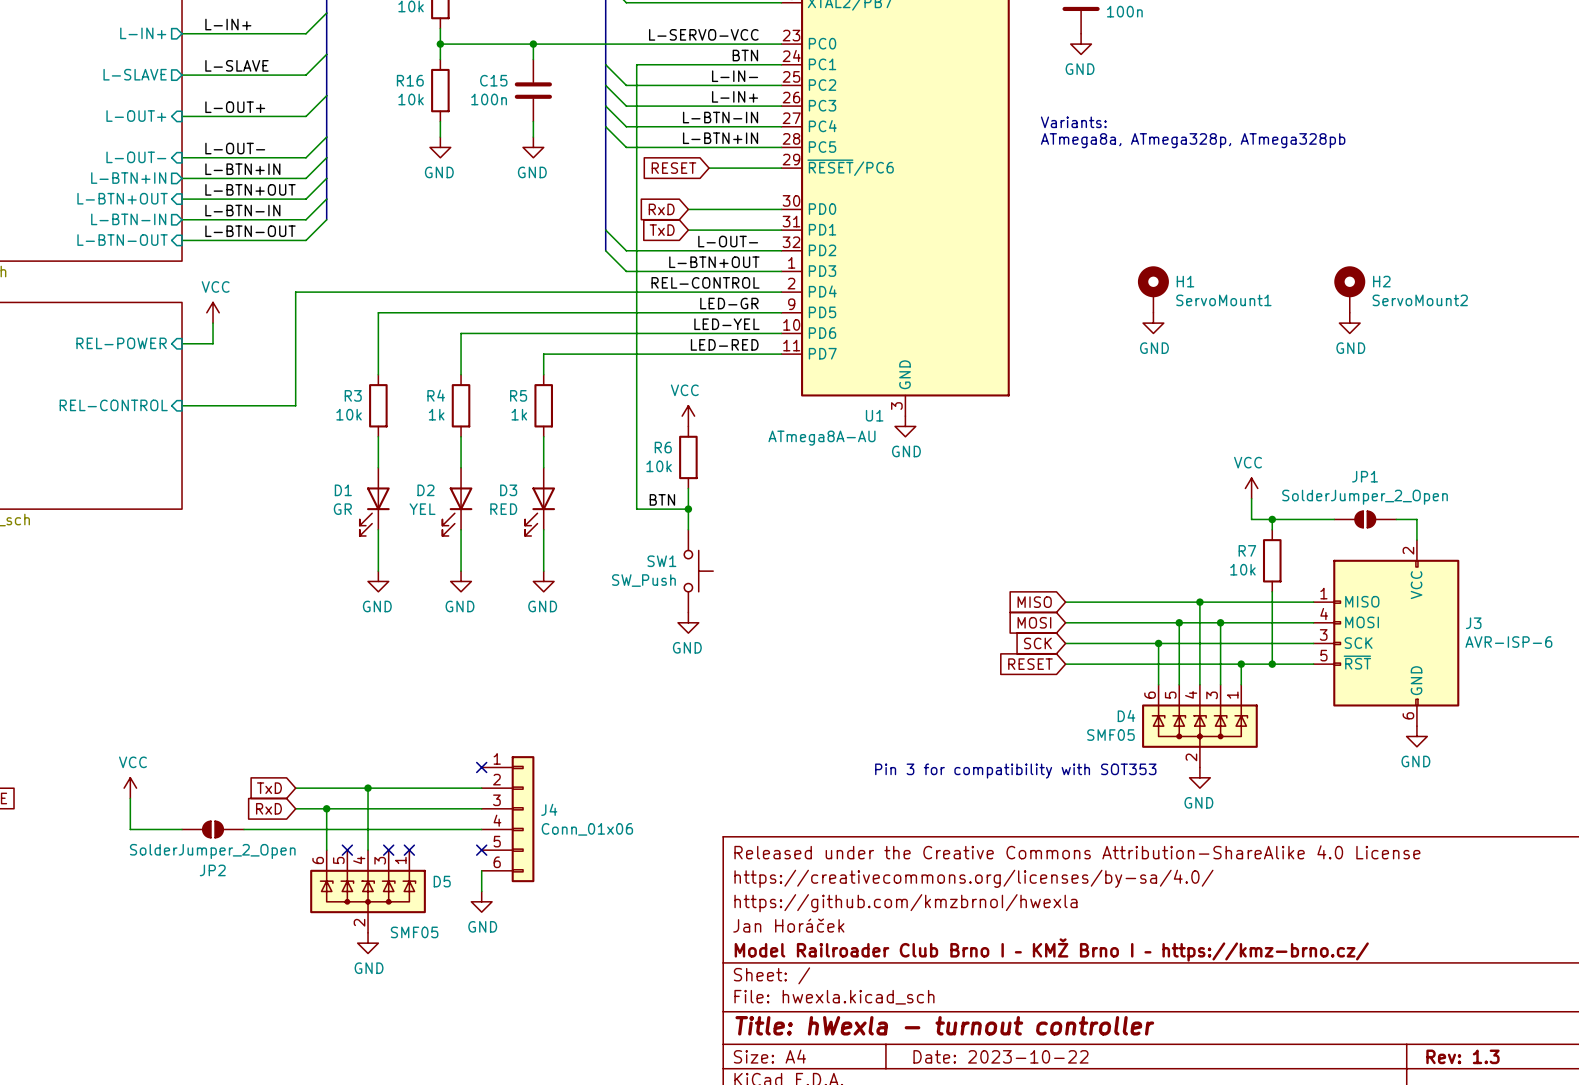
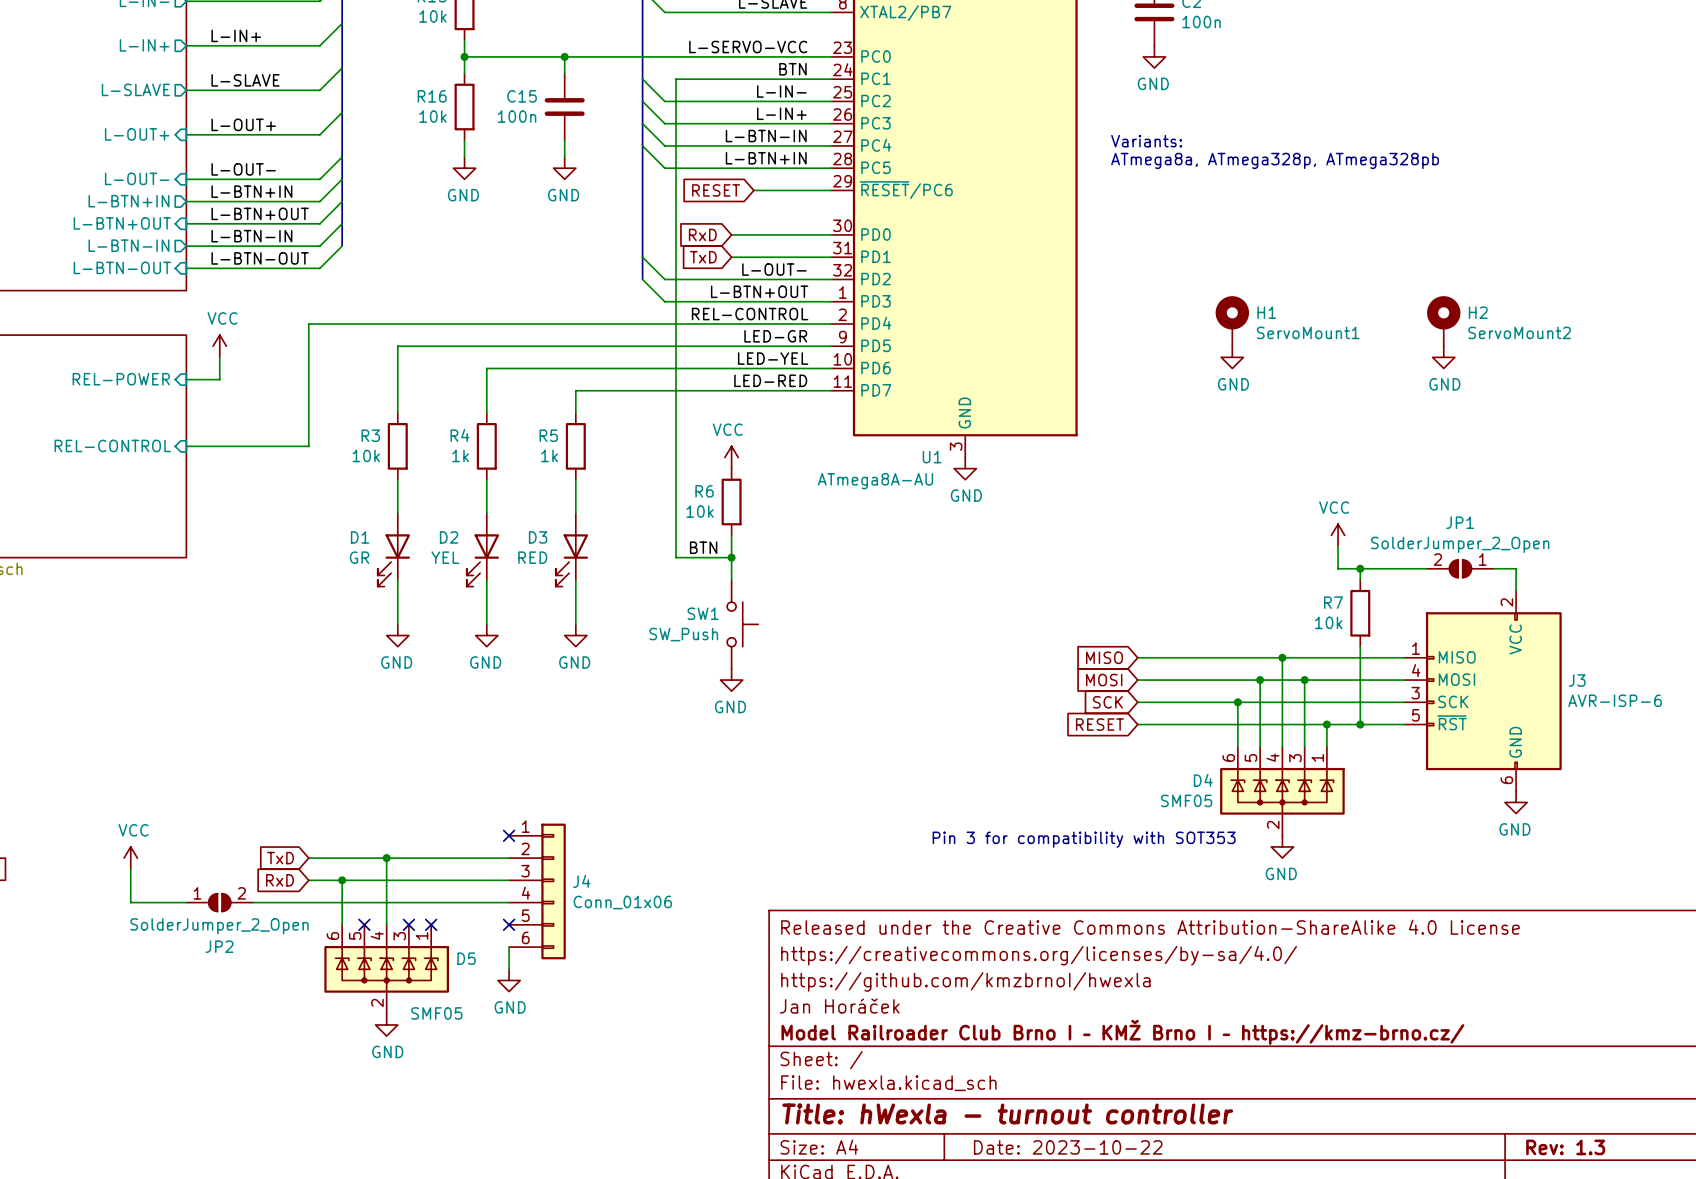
JP1 pin number: none -> 2 (1437, 559)
JP1 pin number: none -> 1 (1482, 559)
JP2 pin number: none -> 1 (197, 893)
JP2 pin number: none -> 2 (241, 893)

